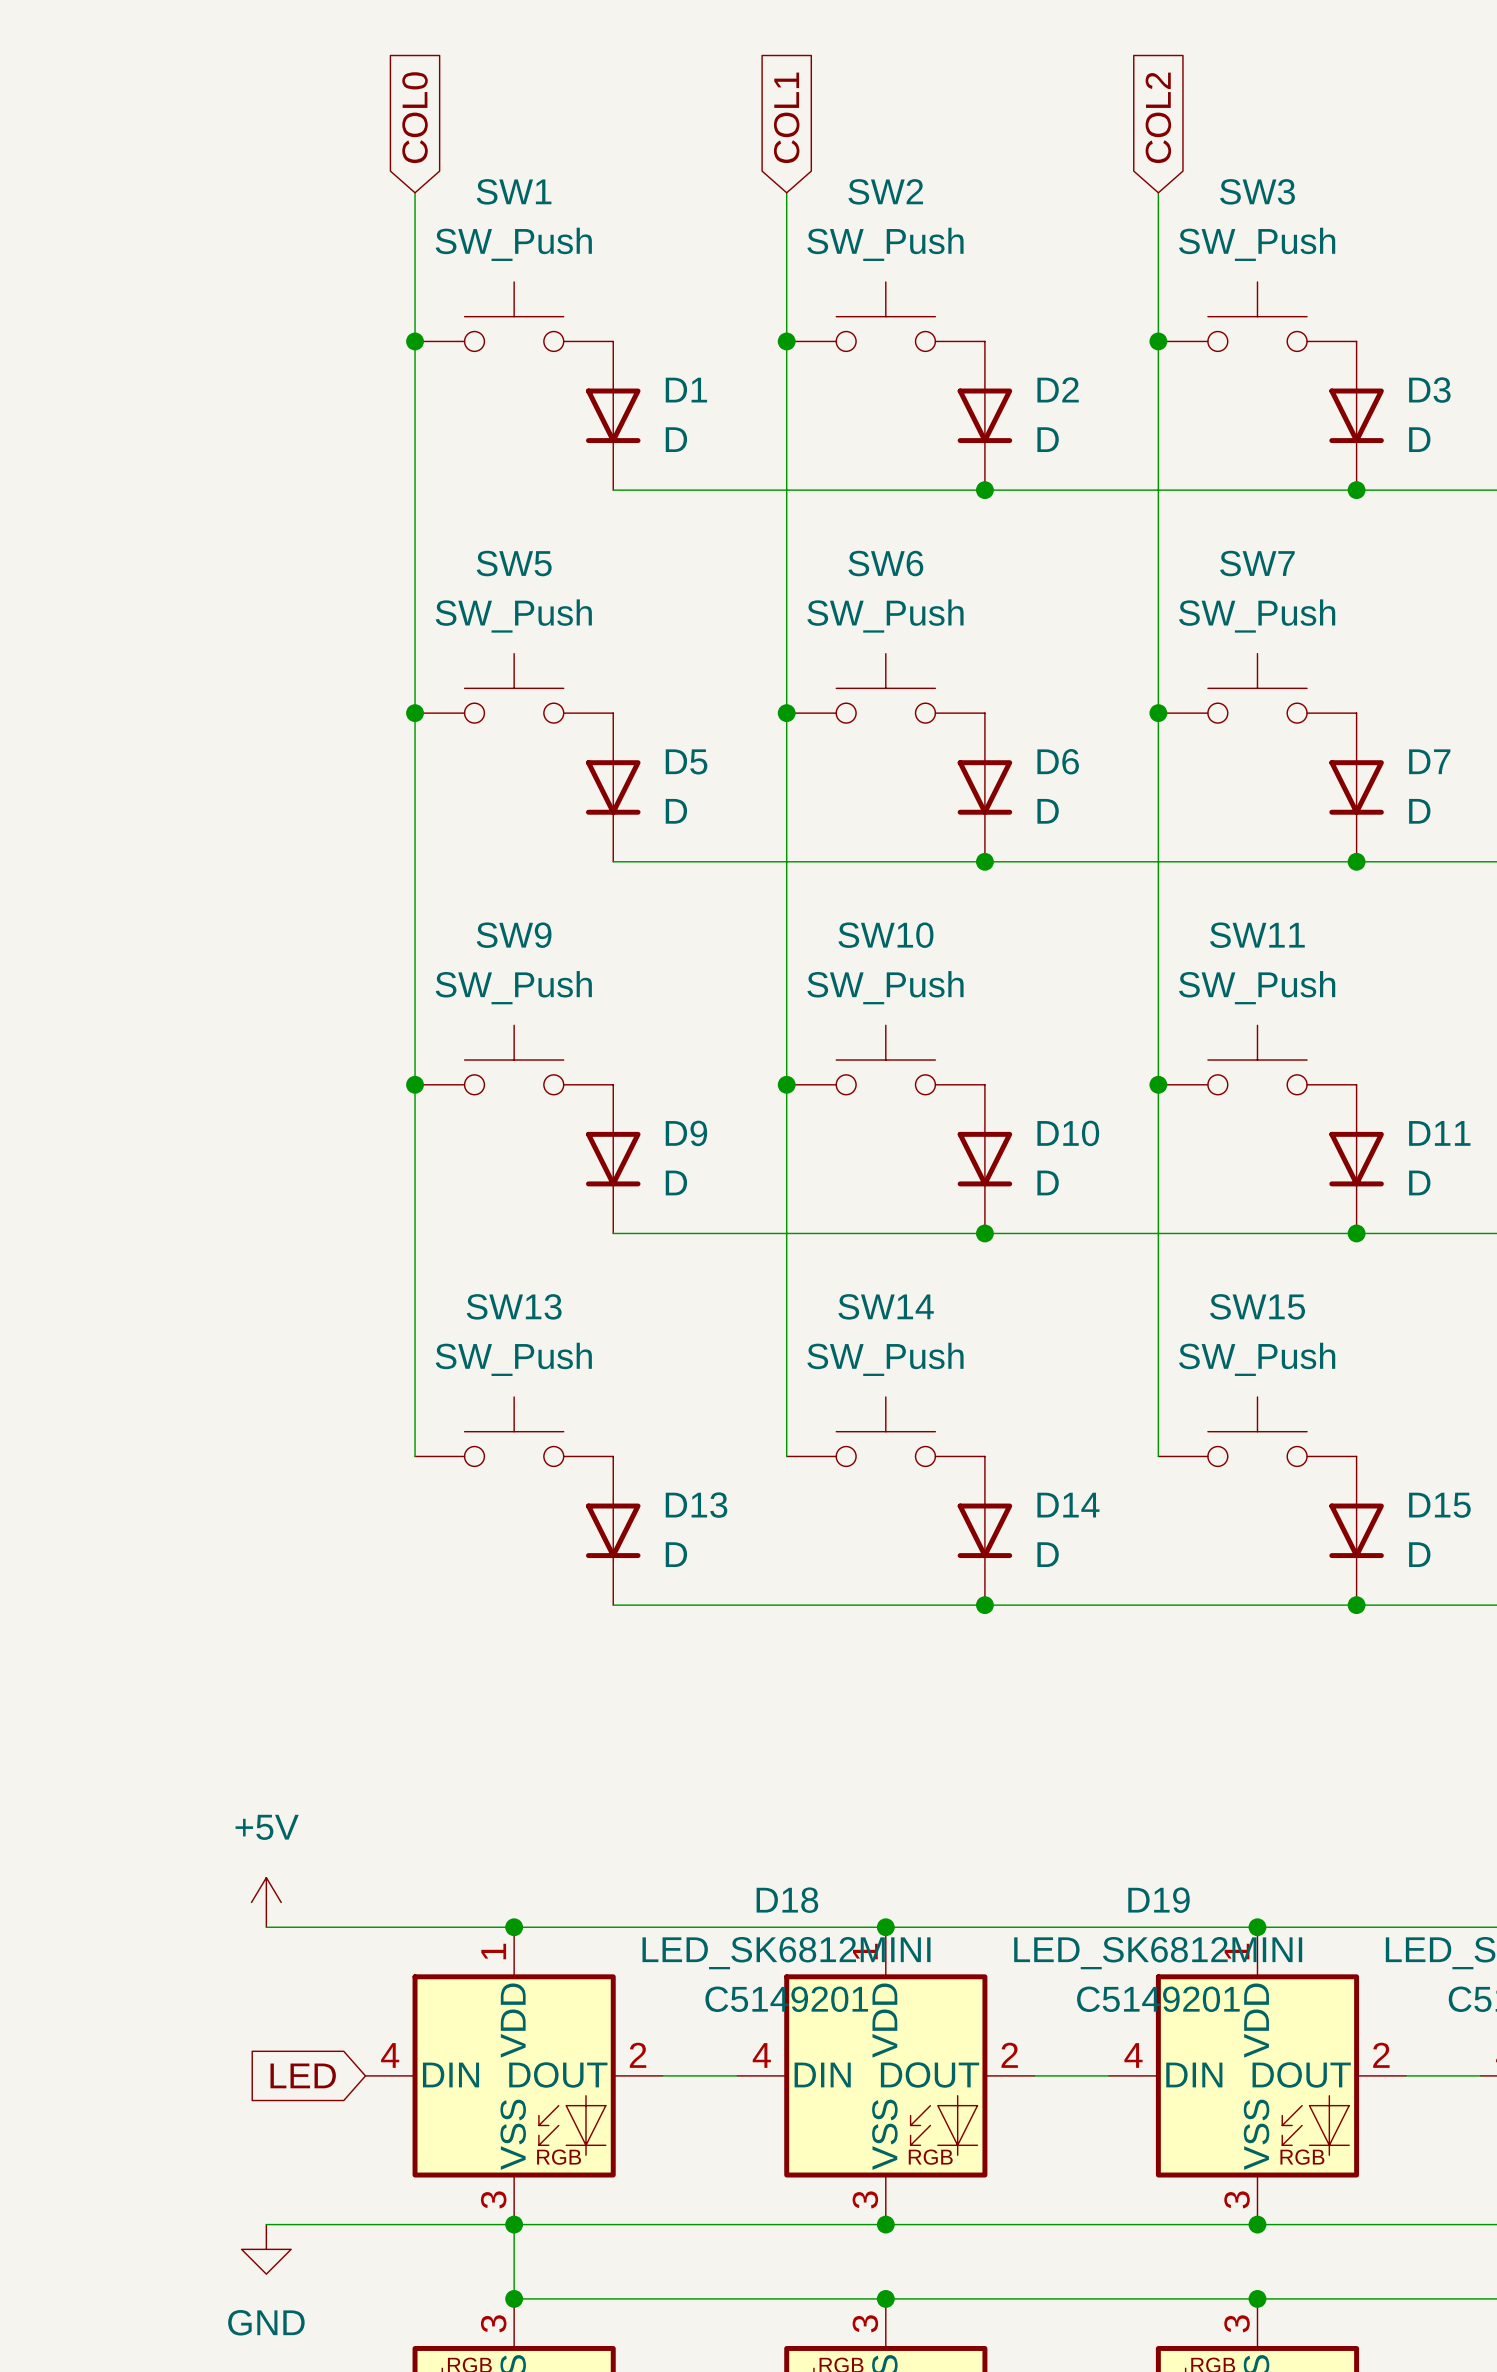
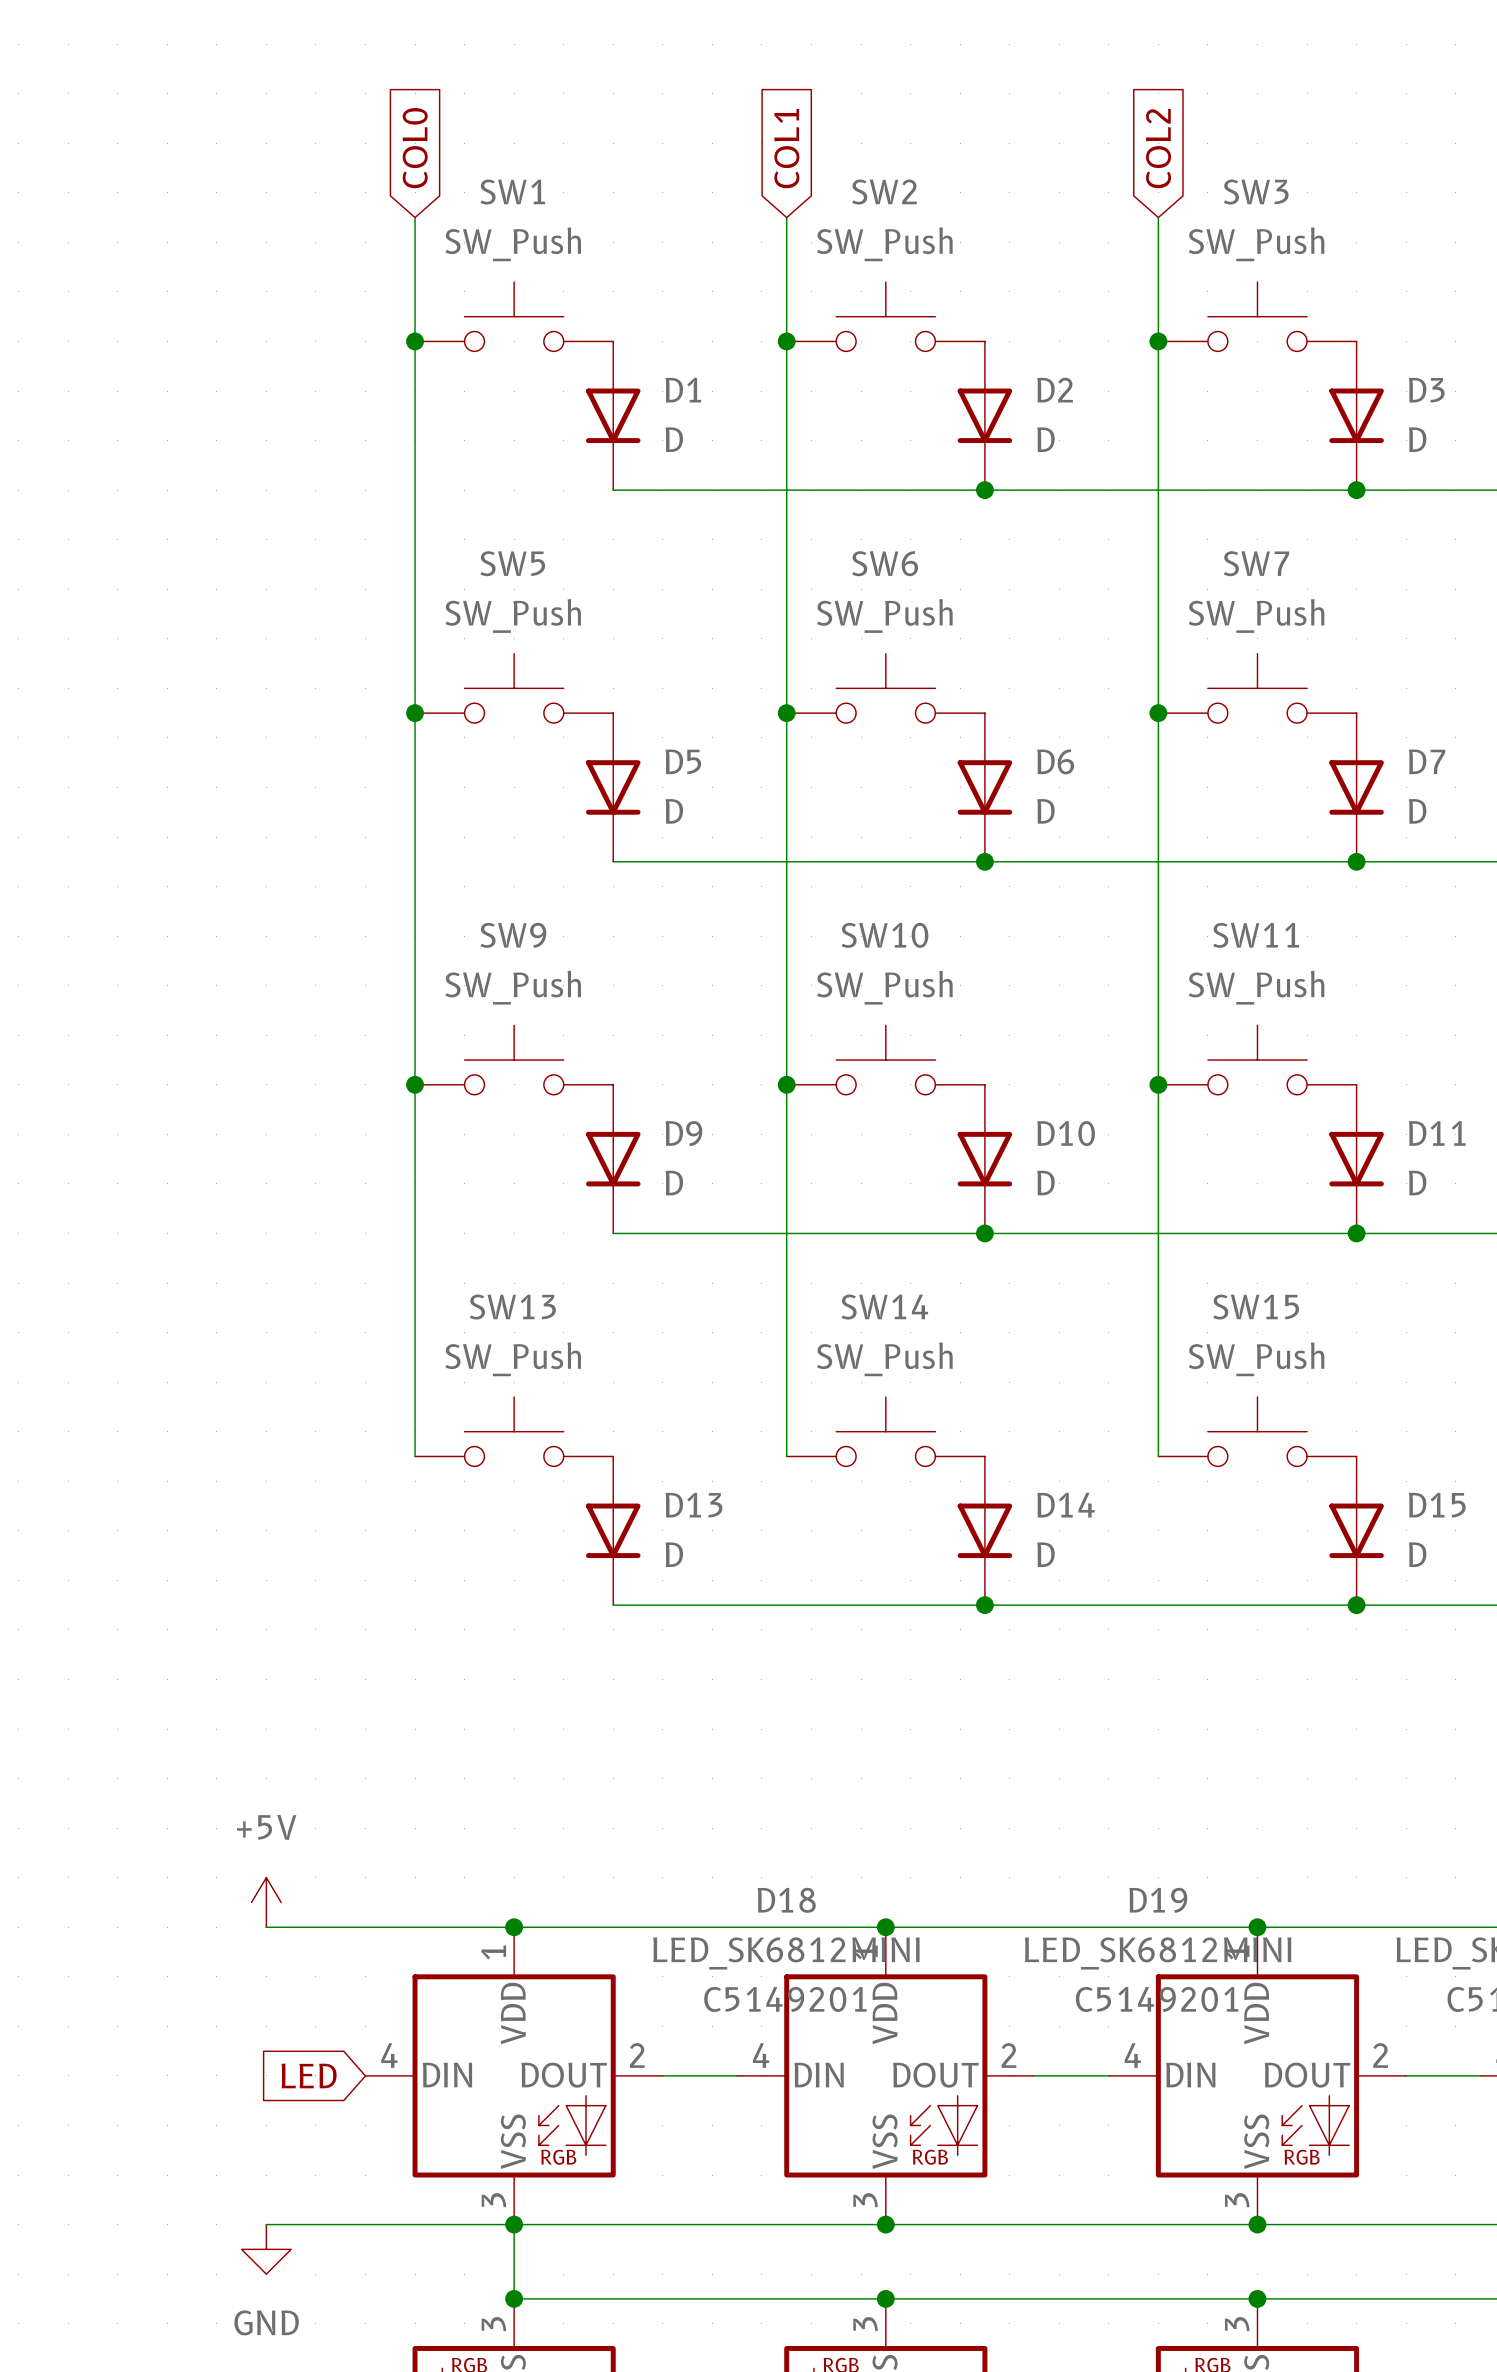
global label position: COL0 (415, 117) -> COL0 (415, 148)
global label position: COL1 (786, 117) -> COL1 (786, 148)
global label position: COL2 (1158, 117) -> COL2 (1158, 148)
wire: (415, 192) (415, 217) -> none
wire: (786, 192) (786, 217) -> none
wire: (1158, 192) (1158, 217) -> none

